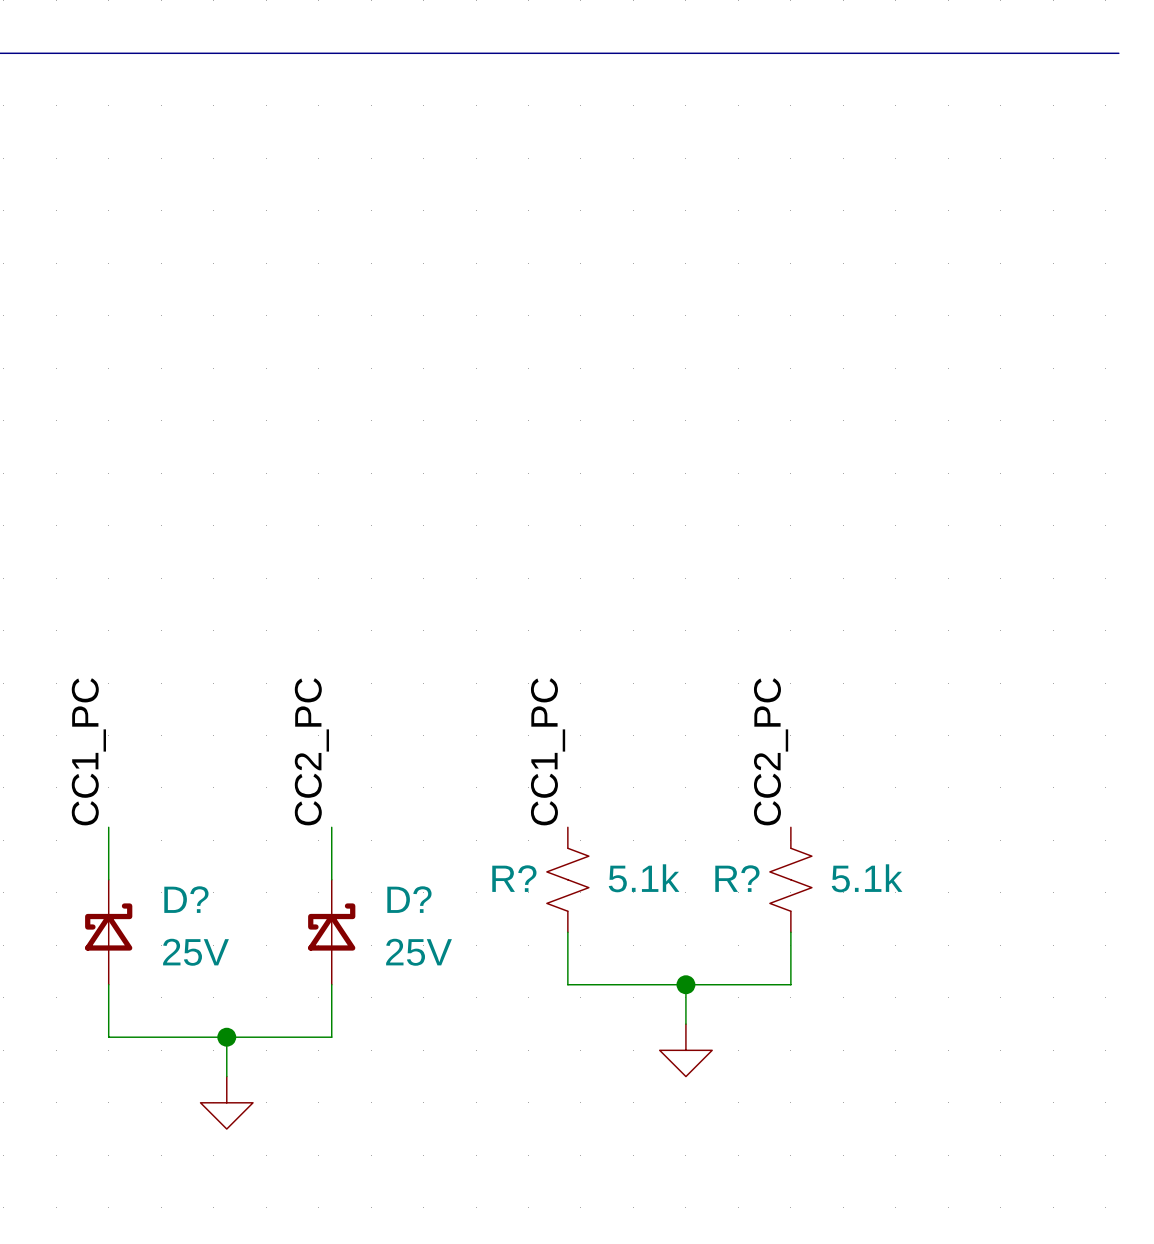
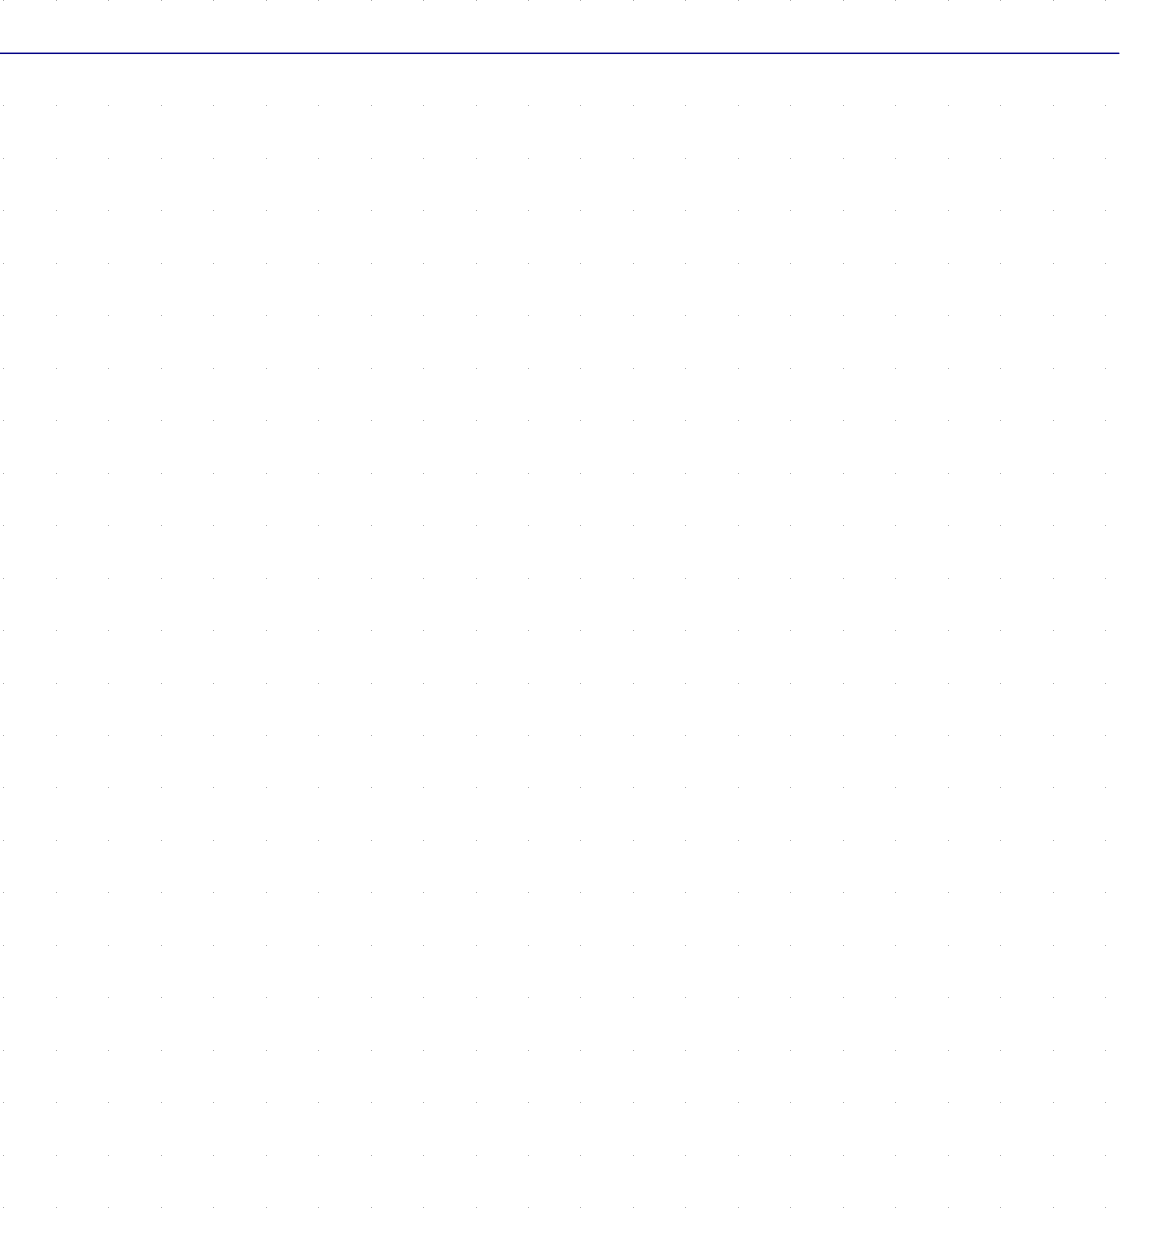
label: CC1_PC (88, 751) -> none
label: CC2_PC (311, 751) -> none
label: CC1_PC (548, 751) -> none
label: CC2_PC (771, 751) -> none
wire: (108, 827) (108, 879) -> none
wire: (331, 827) (331, 879) -> none
R?: 5.1k (567, 879) -> none
R?: 5.1k (790, 879) -> none
D?: 25V (108, 932) -> none
D?: 25V (331, 932) -> none
wire: (567, 932) (567, 984) (790, 984) (790, 932) -> none
wire: (108, 984) (108, 1037) (331, 1037) (331, 984) -> none
wire: (685, 984) (685, 1024) -> none
junction: (685, 984) -> none
wire: (226, 1037) (226, 1076) -> none
junction: (226, 1037) -> none
power symbol: (685, 1050) -> none
power symbol: (226, 1102) -> none

